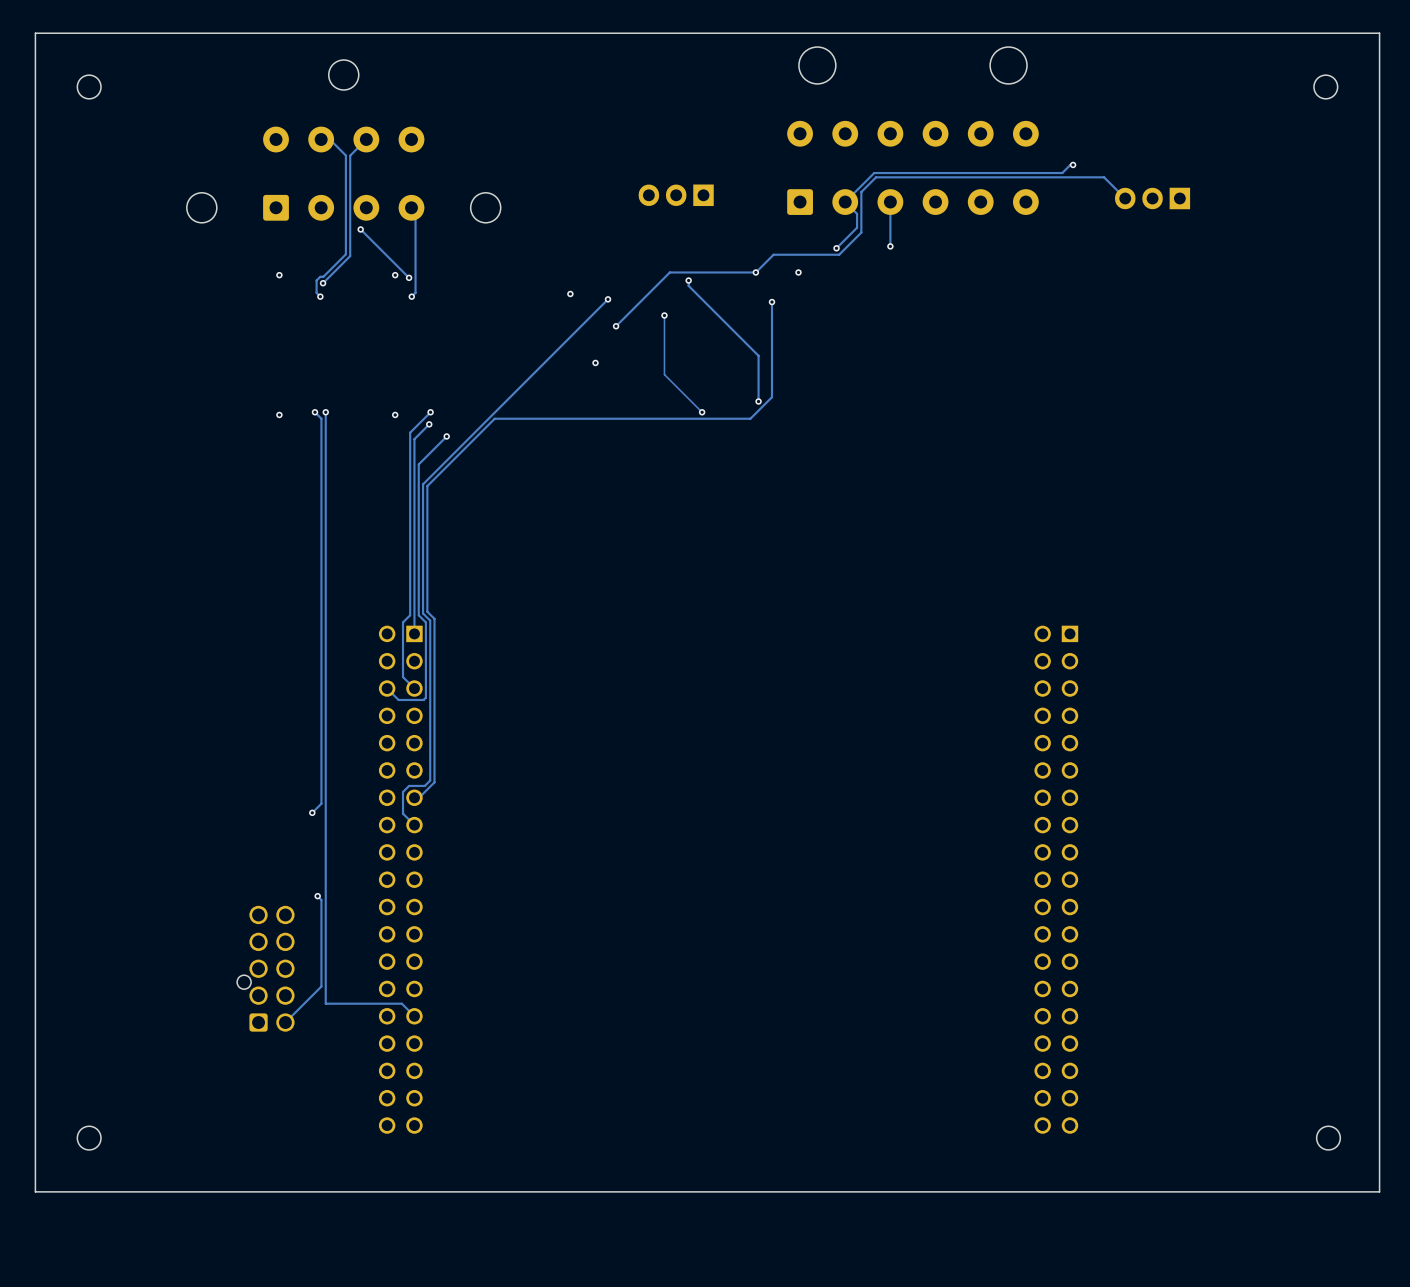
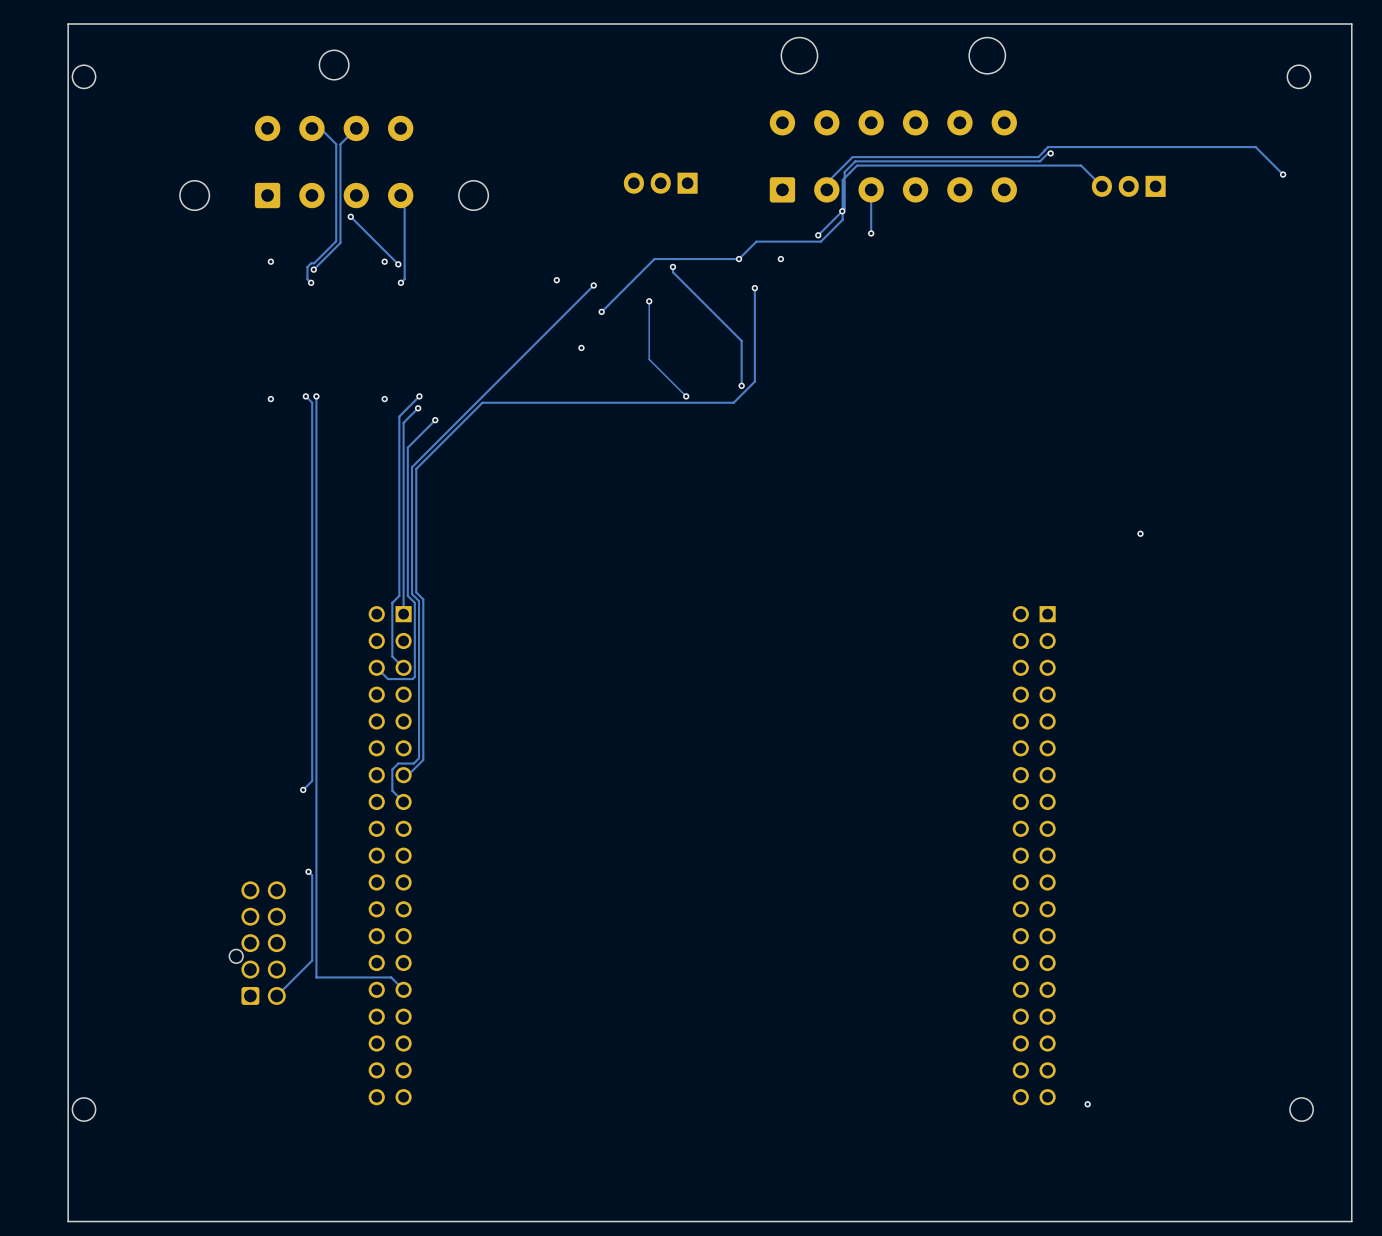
board edge: (73, 33) (35, 33) (35, 1191) (1379, 1191) -> (68, 24) (68, 1221) (1351, 1221) (1351, 1162)
track: (863, 183) (845, 202) (857, 213) (857, 227) -> (844, 172) (844, 208) (838, 215)
track: none -> (1283, 174) (1255, 147) (1048, 147) (1038, 157) (852, 157) (826, 182) (826, 189)
via: none -> (1283, 174)
via: none -> (842, 211)
via: none -> (1140, 533)
via: none -> (1087, 1104)

